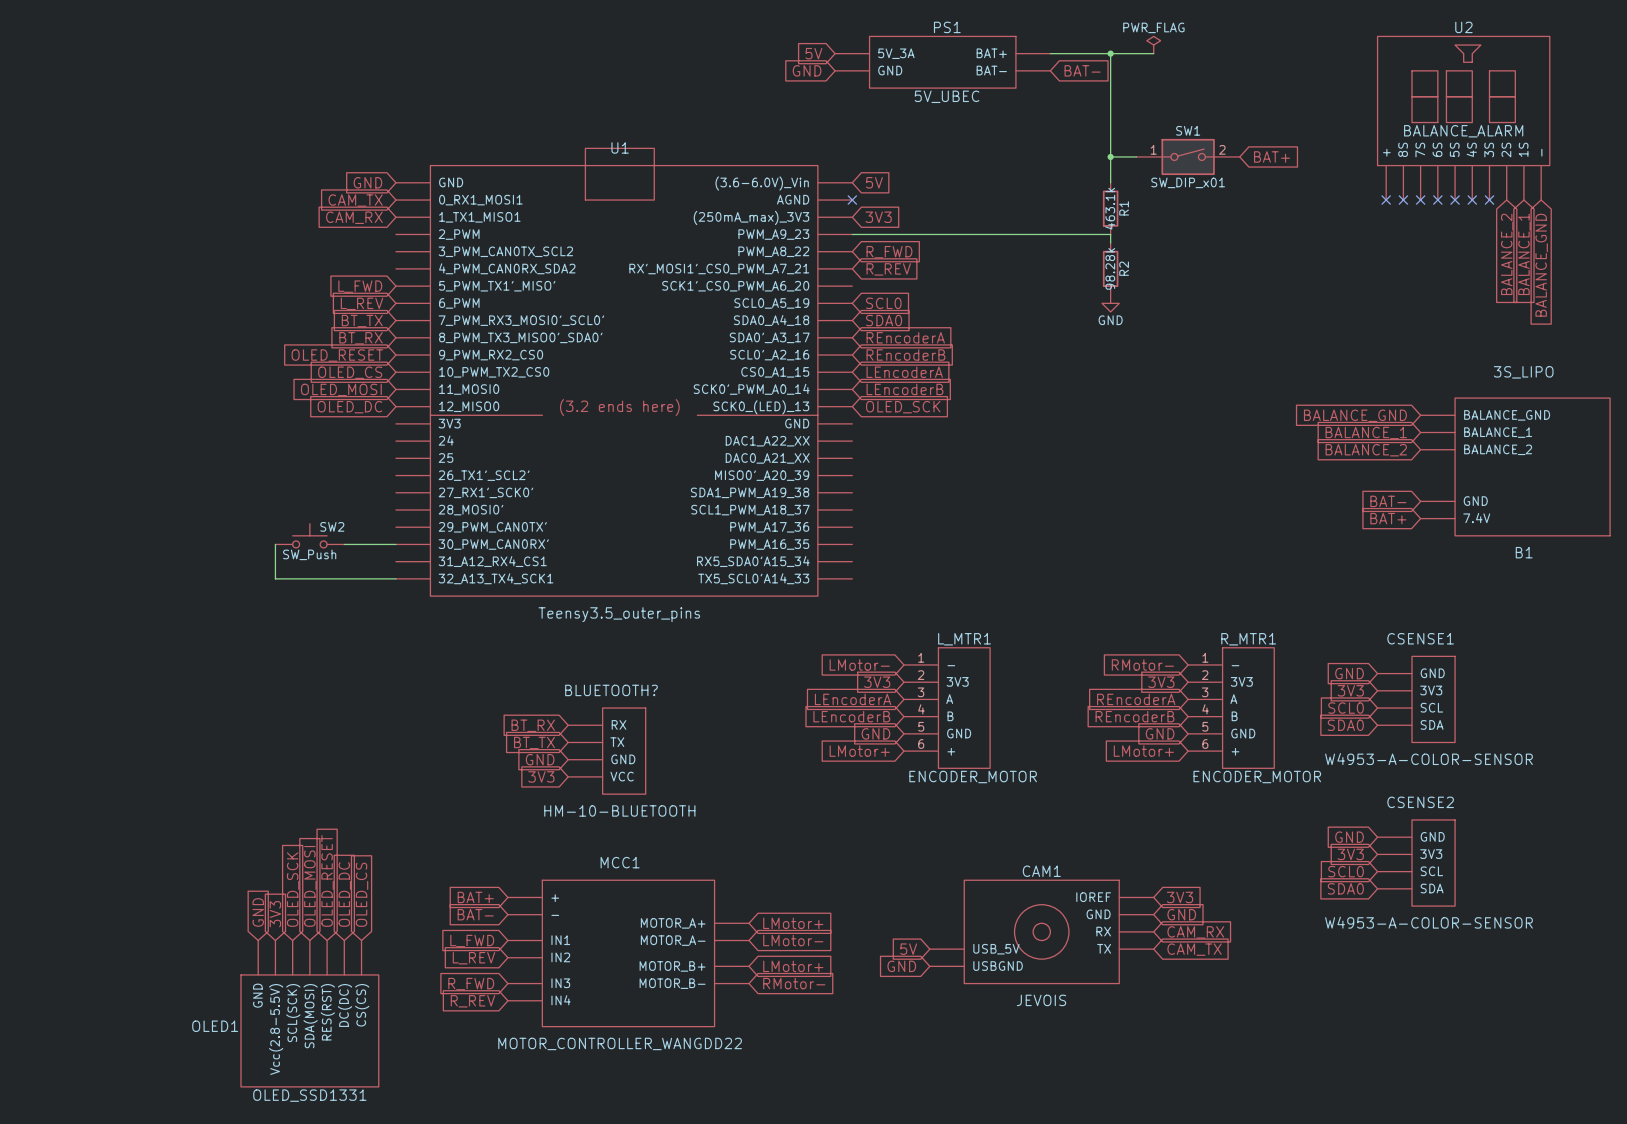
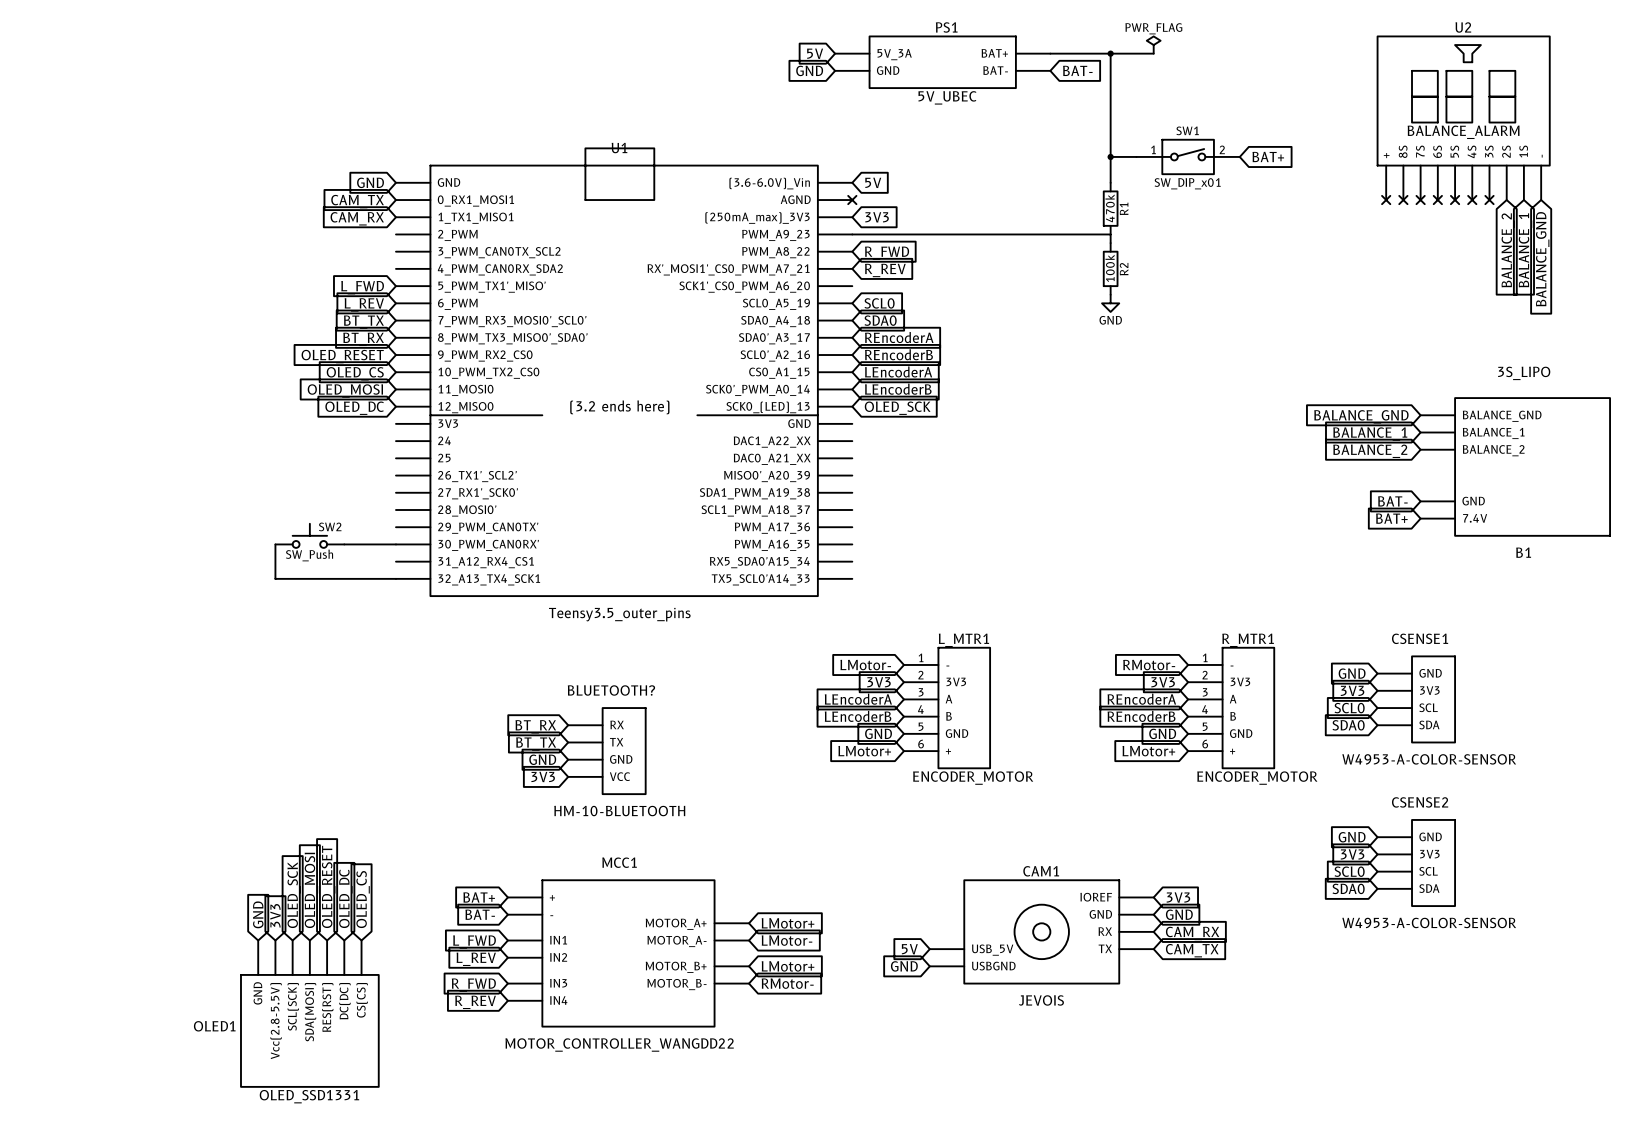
R1 value: 463.1k (1110, 208) -> 470k (1110, 208)
R2 value: 98.28k (1110, 268) -> 100k (1110, 268)

